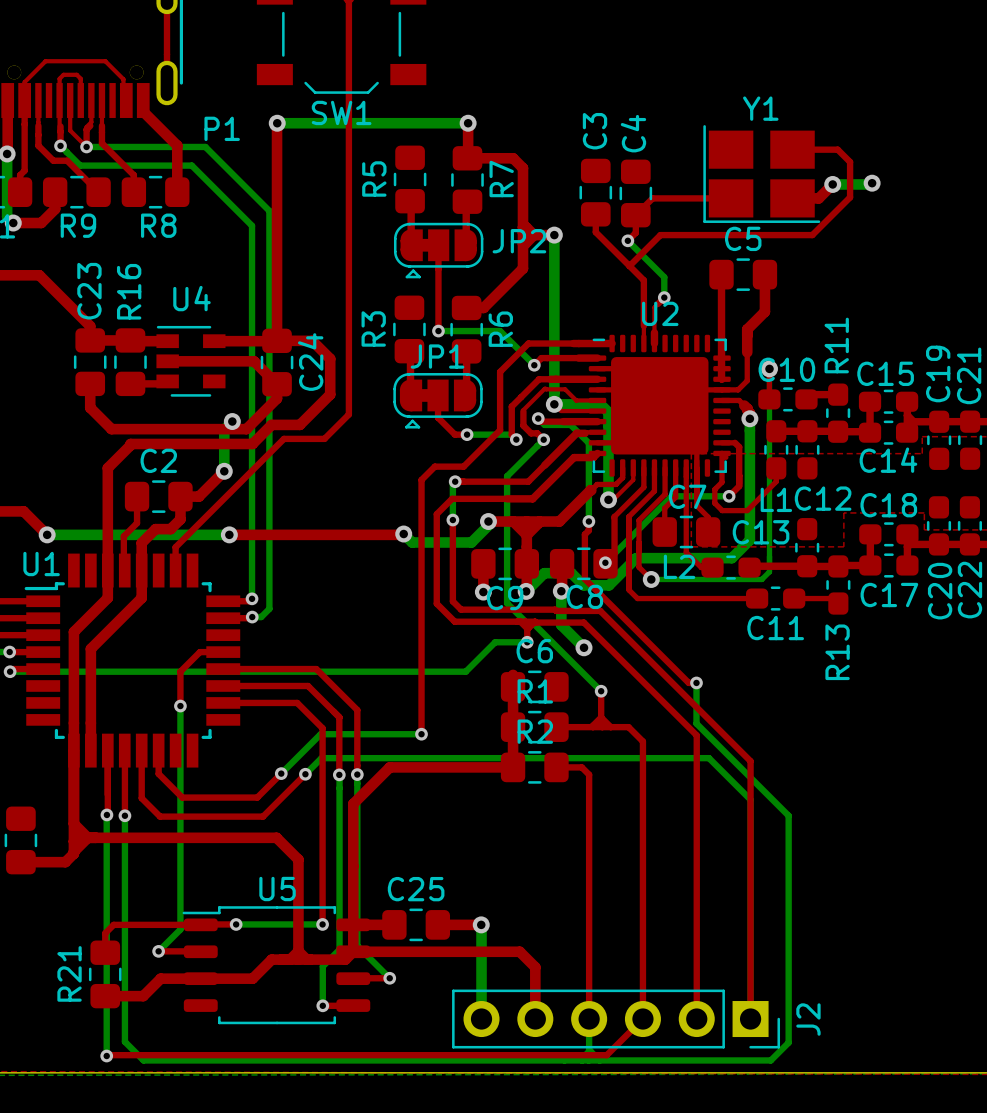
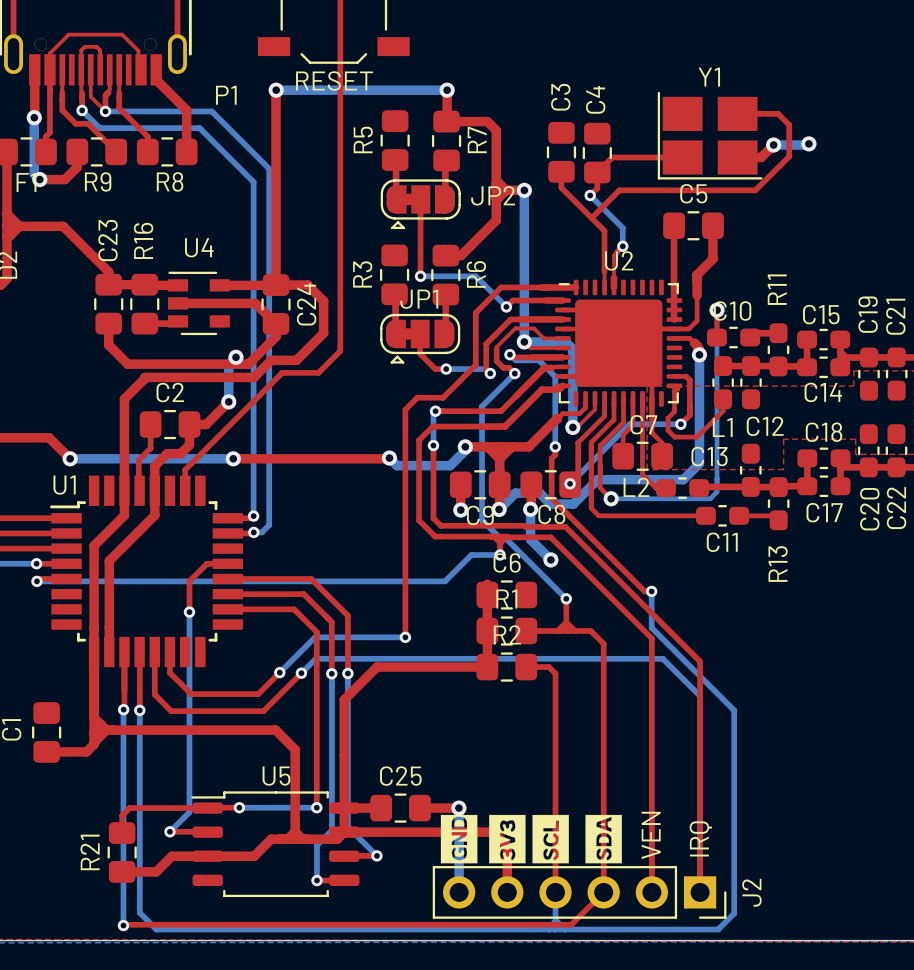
SW1 name: SW1 (341, 112) -> RESET (334, 80)
drawing: none -> [440, 814, 622, 864]
text: none -> VEN (651, 835)
text: none -> IRQ (700, 838)

